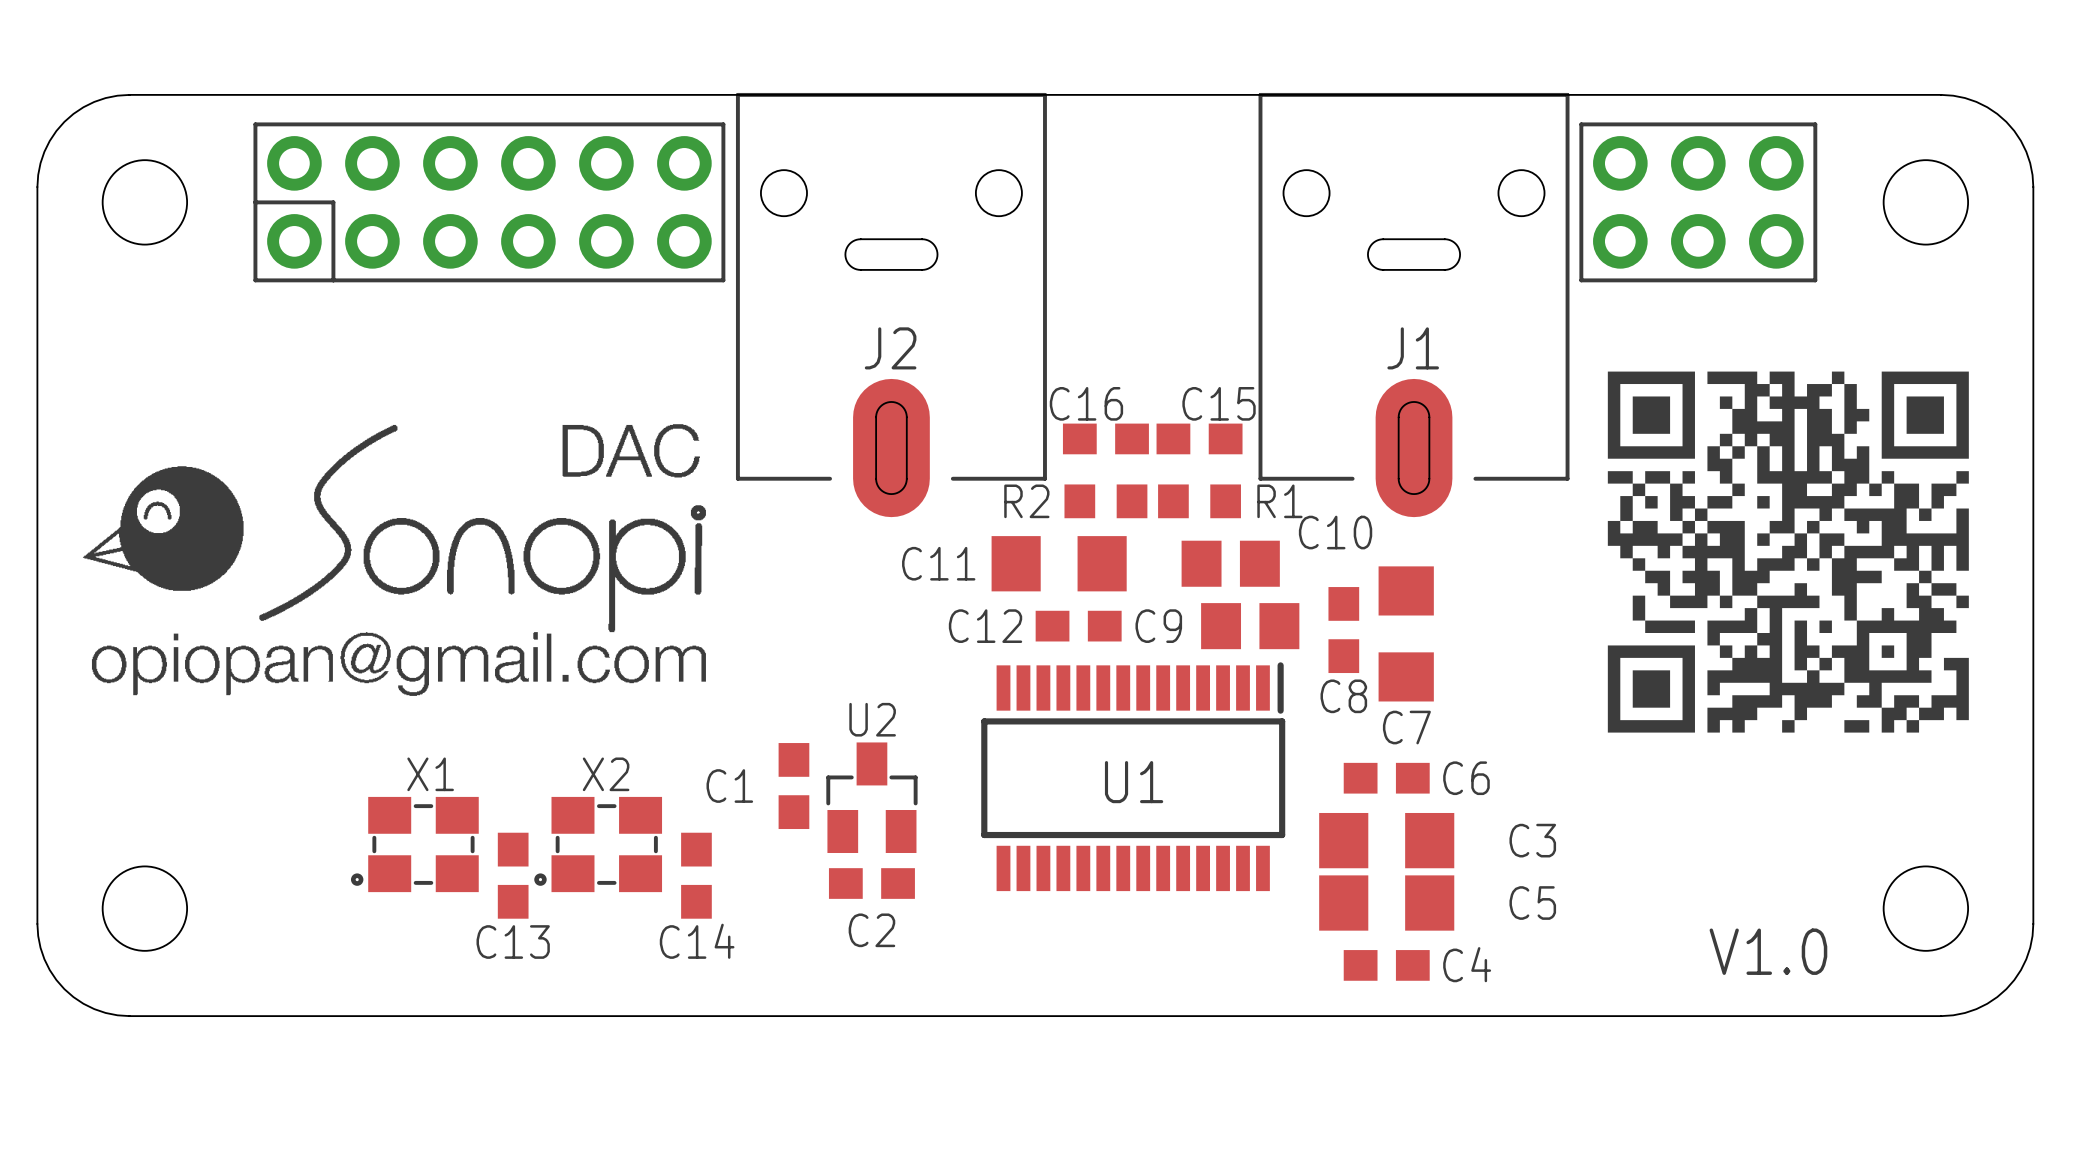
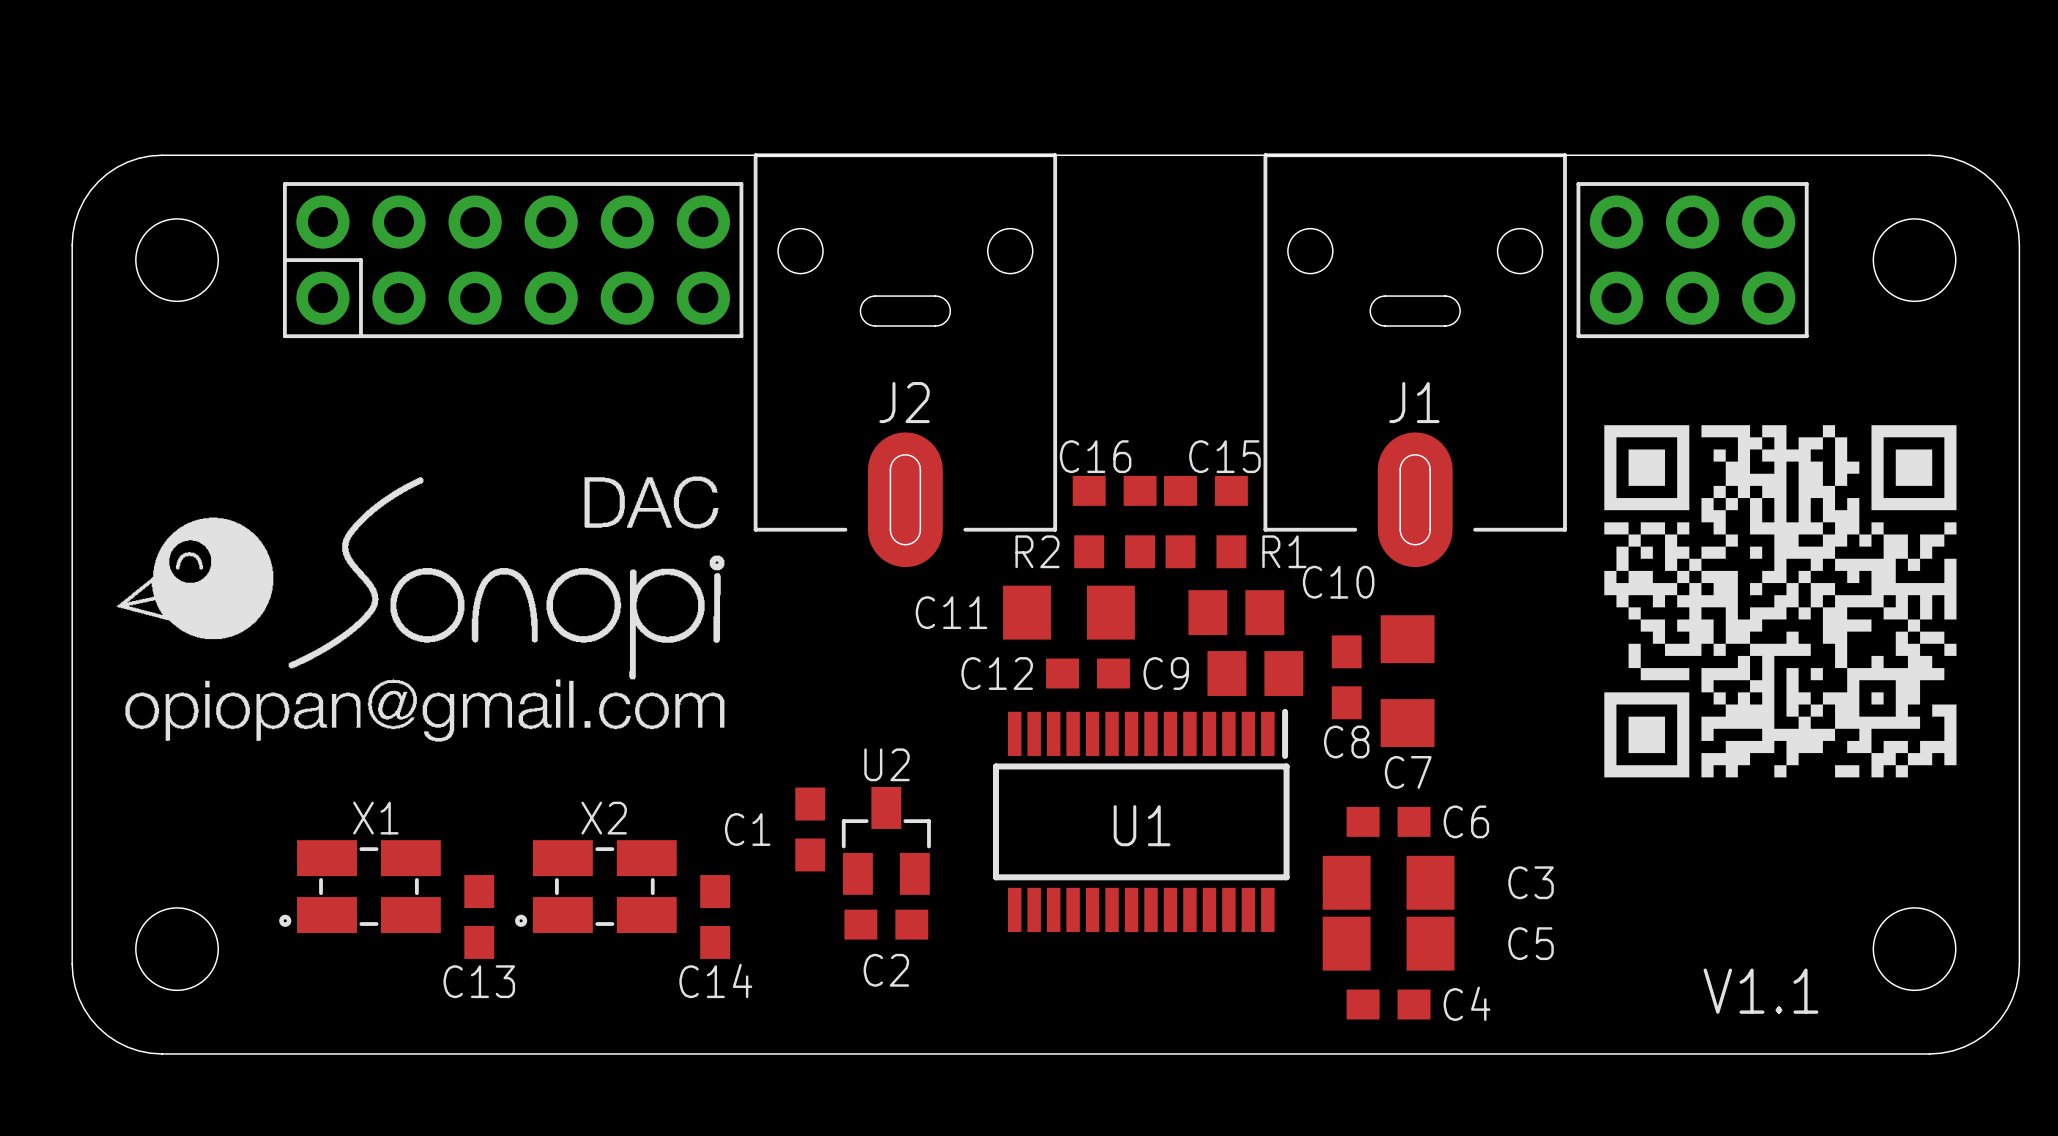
X1 footprint: [350, 796, 479, 893] -> [279, 840, 441, 934]
X2 footprint: [534, 796, 663, 893] -> [515, 840, 677, 934]
C13 position: (513, 875) -> (479, 917)
text: V1.0 (1768, 951) -> V1.1 (1760, 991)

